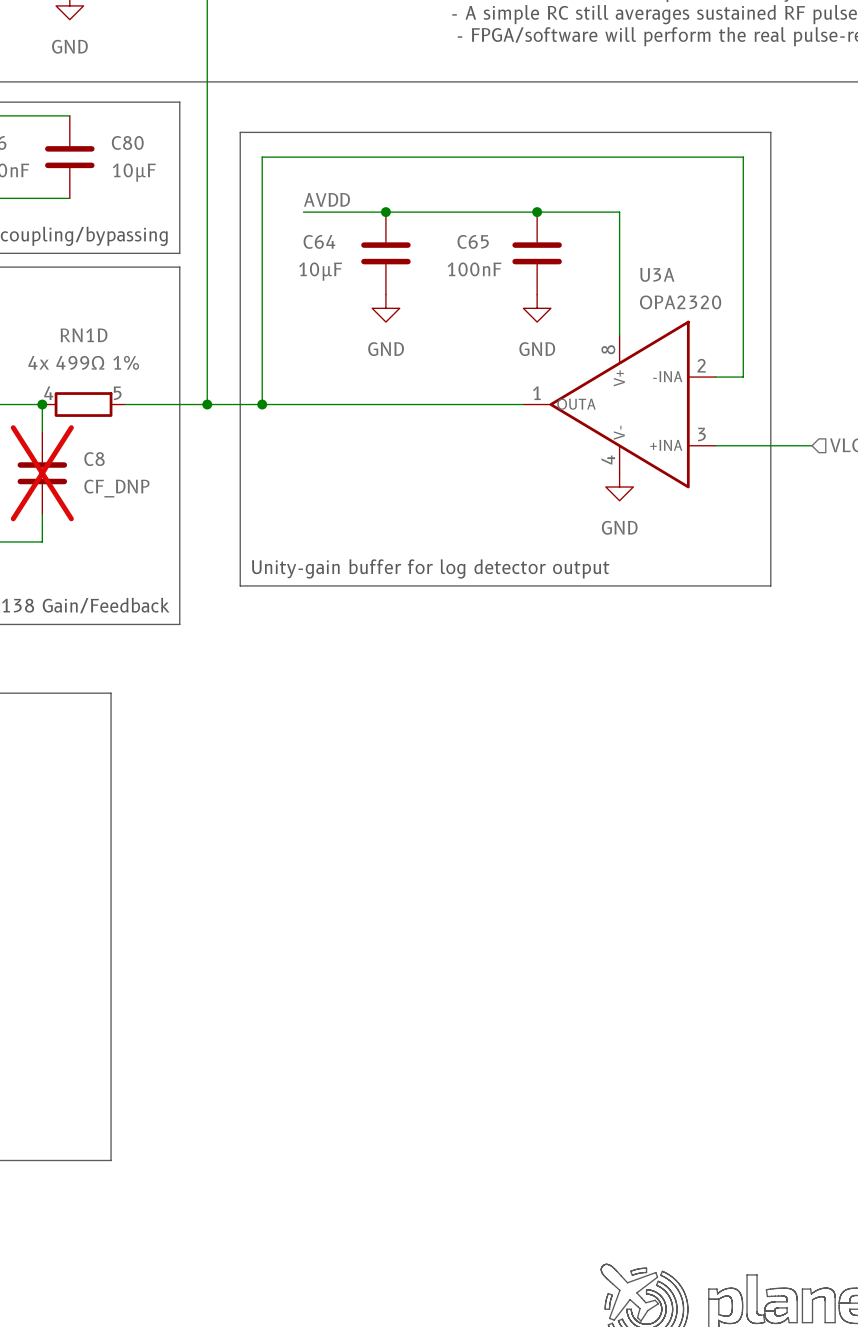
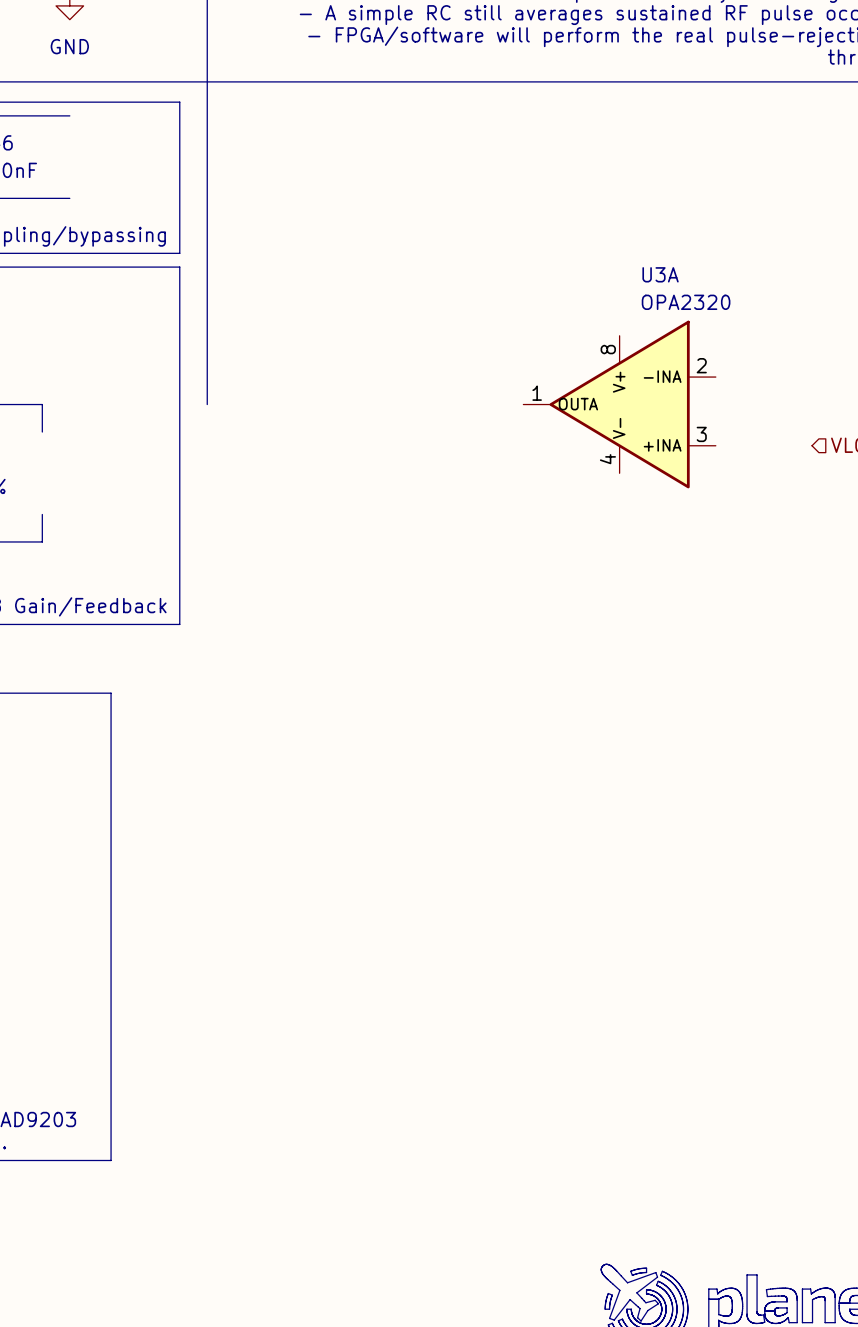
line: (240, 132) (770, 132) (770, 585) (240, 585) (240, 132) -> none
C80: 10µF (69, 157) -> none
label: AVDD (326, 199) -> none
wire: (303, 212) (619, 212) (619, 335) -> none
junction: (385, 212) -> none
junction: (537, 212) -> none
C64: 10µF (385, 253) -> none
C65: 100nF (537, 253) -> none
power symbol: GND (385, 308) -> none
power symbol: GND (537, 308) -> none
wire: (715, 377) (743, 377) (743, 157) (262, 157) (262, 404) -> none
junction: (42, 404) -> none
RN1D: 4x 499Ω 1% (83, 404) -> none
wire: (124, 404) (523, 404) -> none
junction: (207, 404) -> none
junction: (262, 404) -> none
wire: (715, 445) (812, 445) -> none
C8: CF_DNP (42, 473) -> none
power symbol: GND (619, 487) -> none
text: Unity-gain buffer for log detector output (430, 568) -> none

